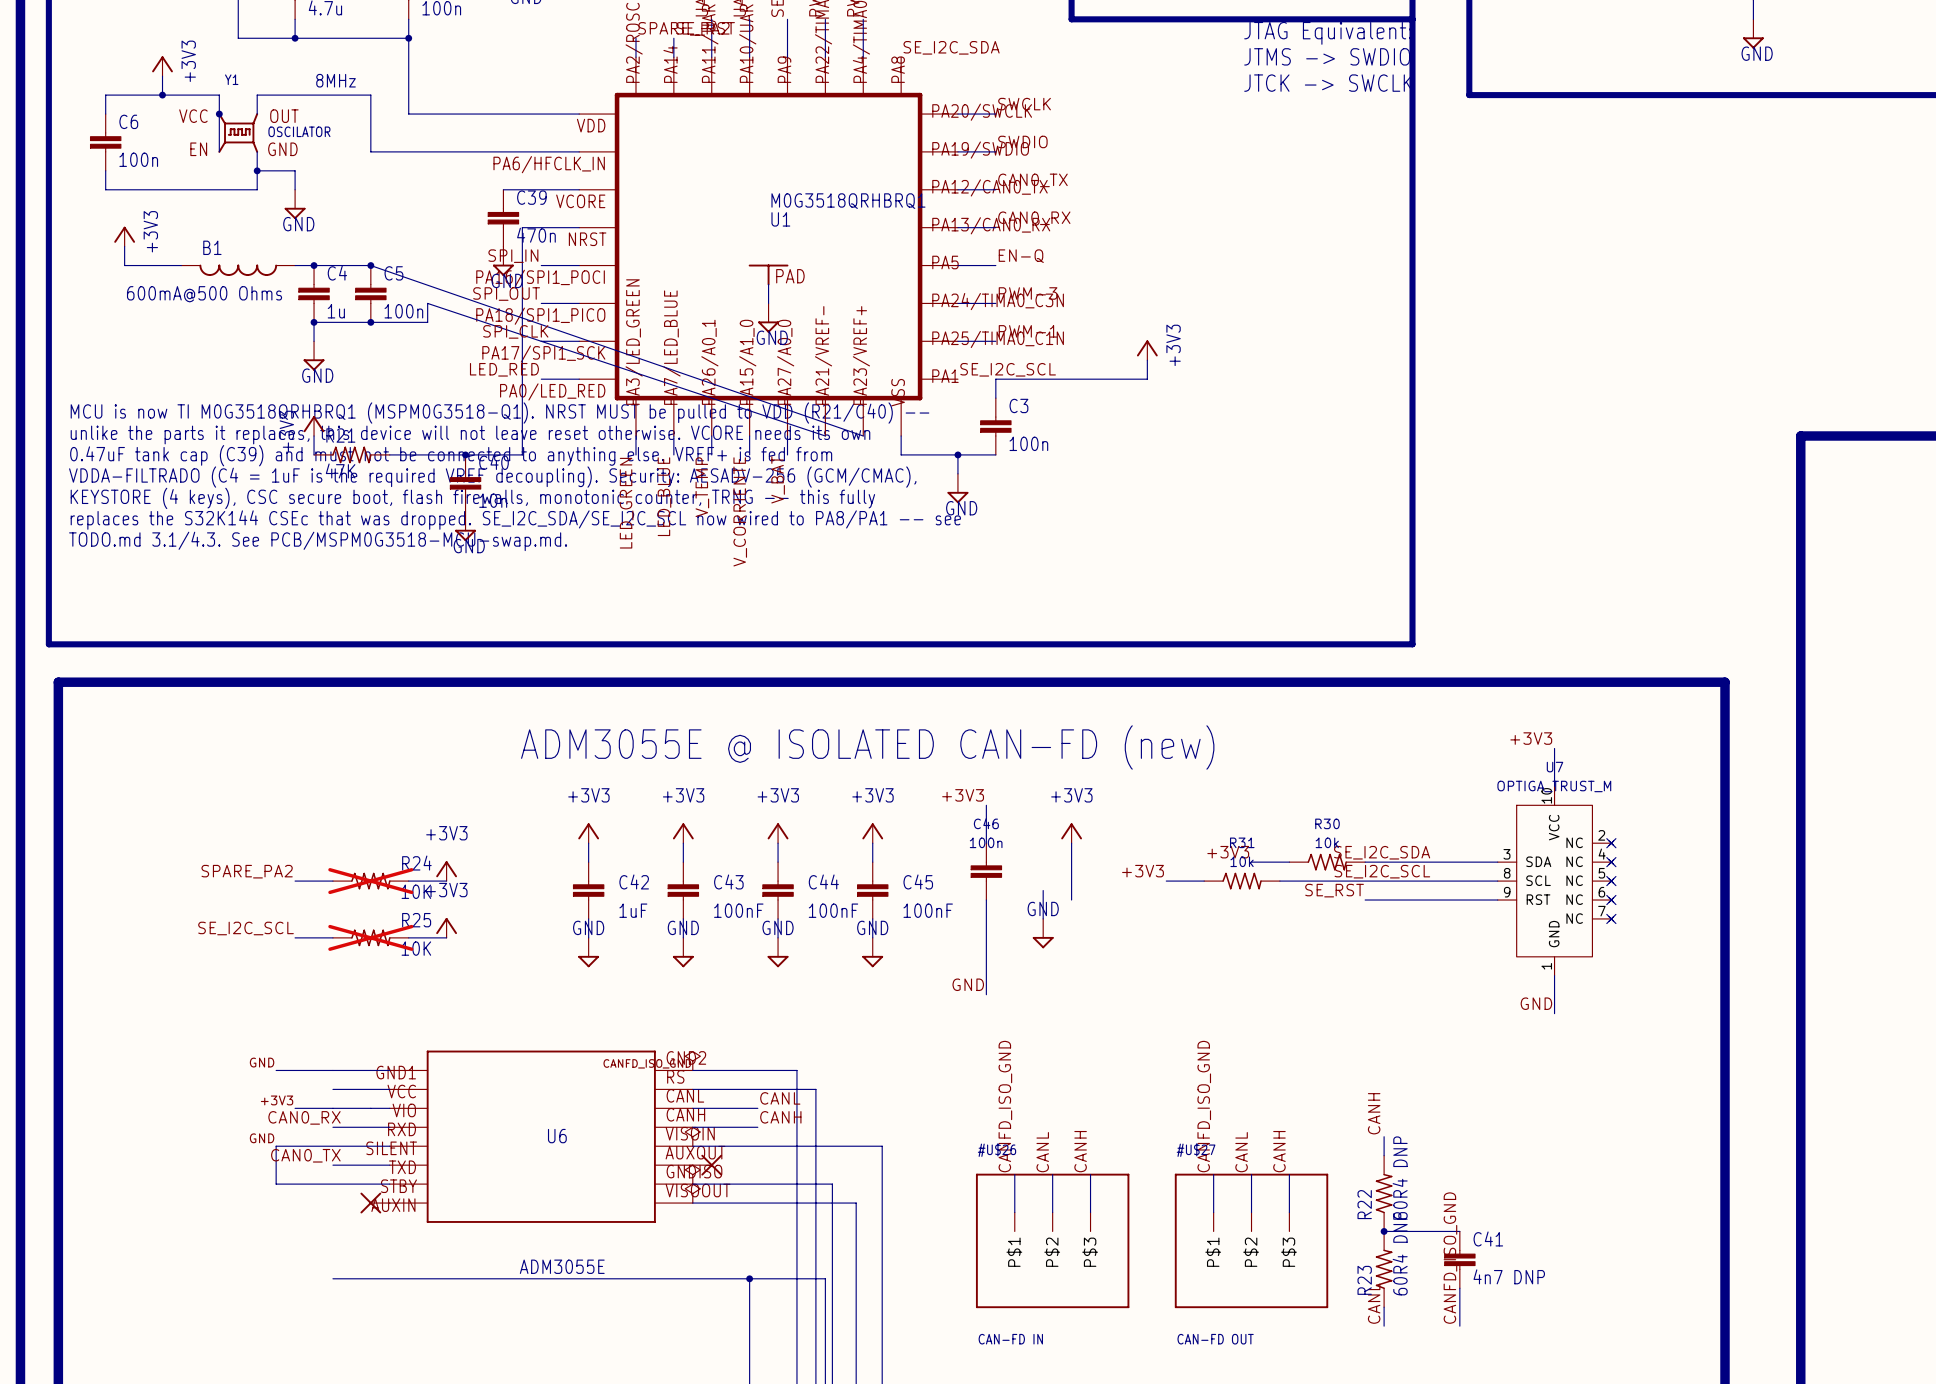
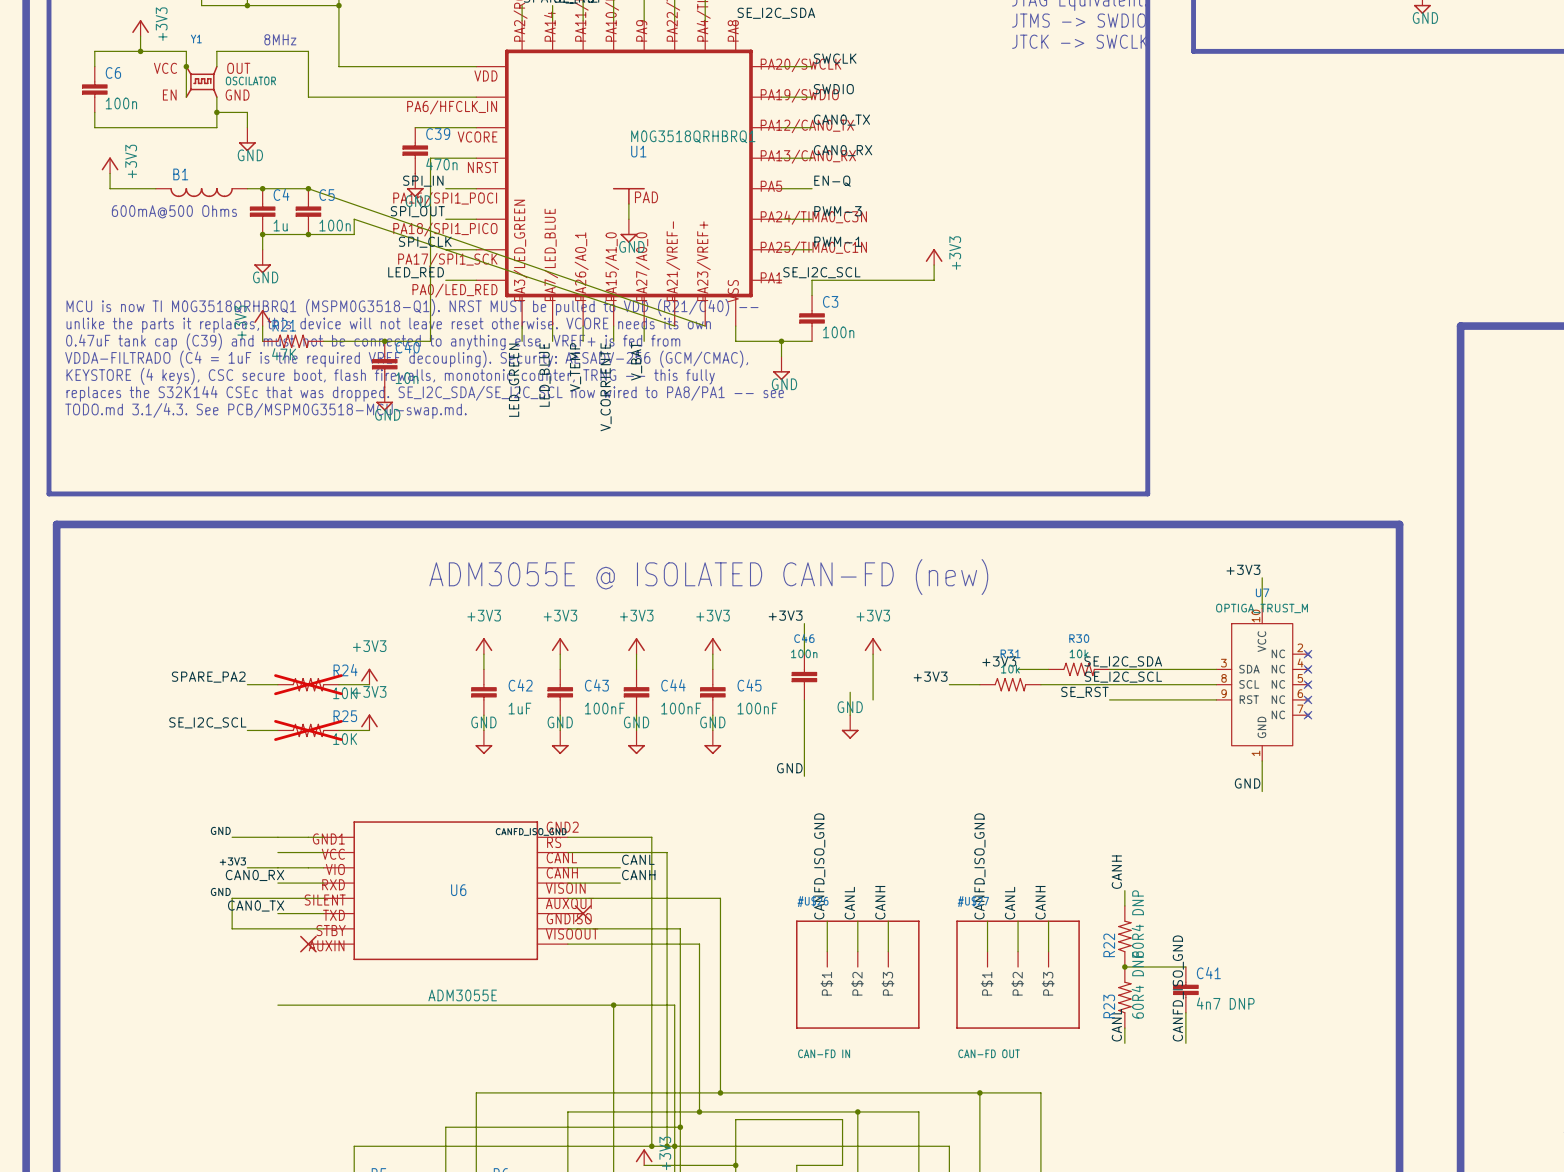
power symbol: (692, 1060) -> none
power symbol: (692, 1136) -> none
power symbol: (692, 1174) -> none
power symbol: (692, 1193) -> none

